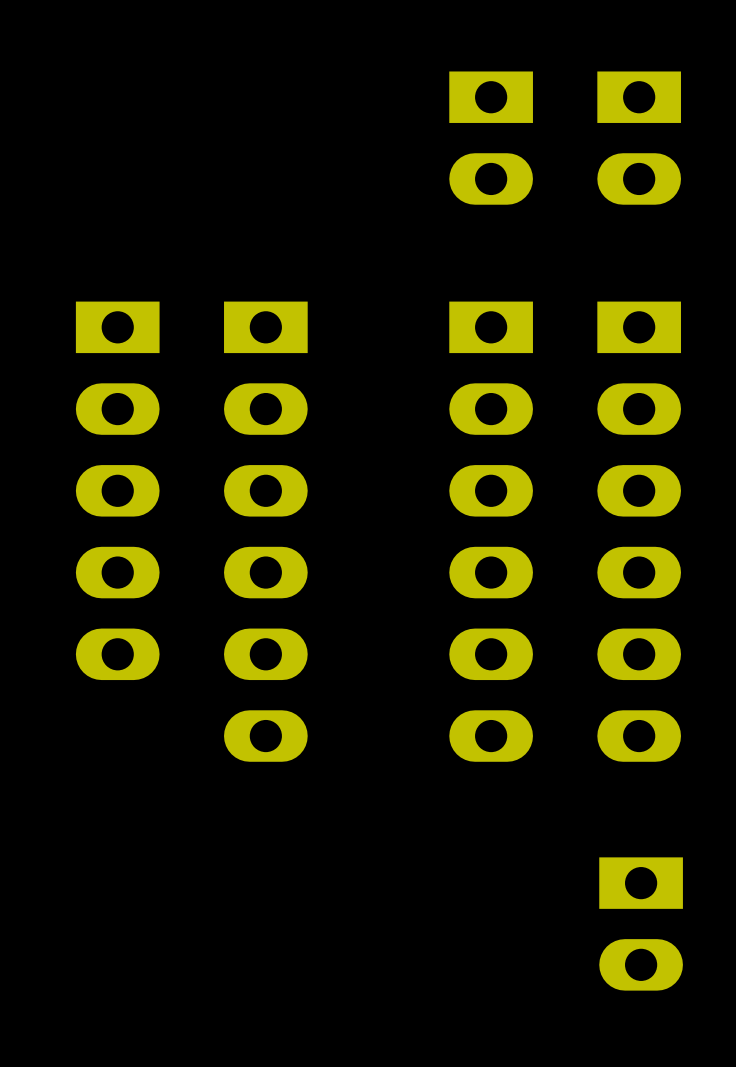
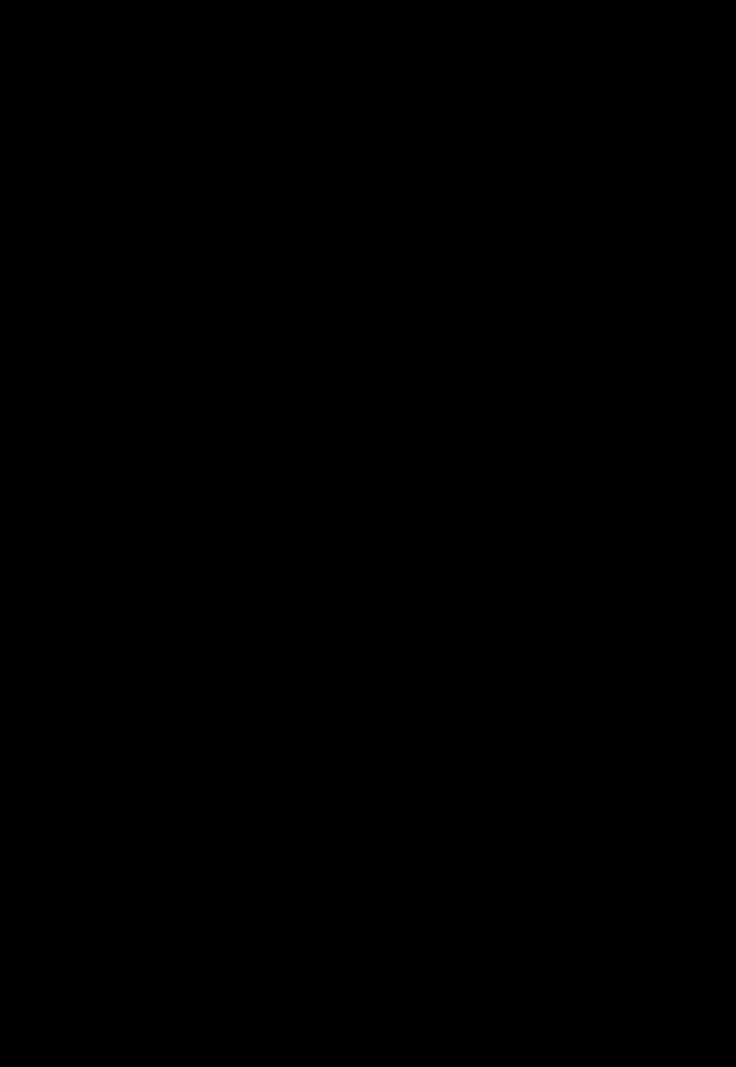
part: (491, 138) -> none
part: (639, 138) -> none
part: (117, 490) -> none
part: (265, 531) -> none
part: (491, 531) -> none
part: (639, 531) -> none
part: (641, 923) -> none

